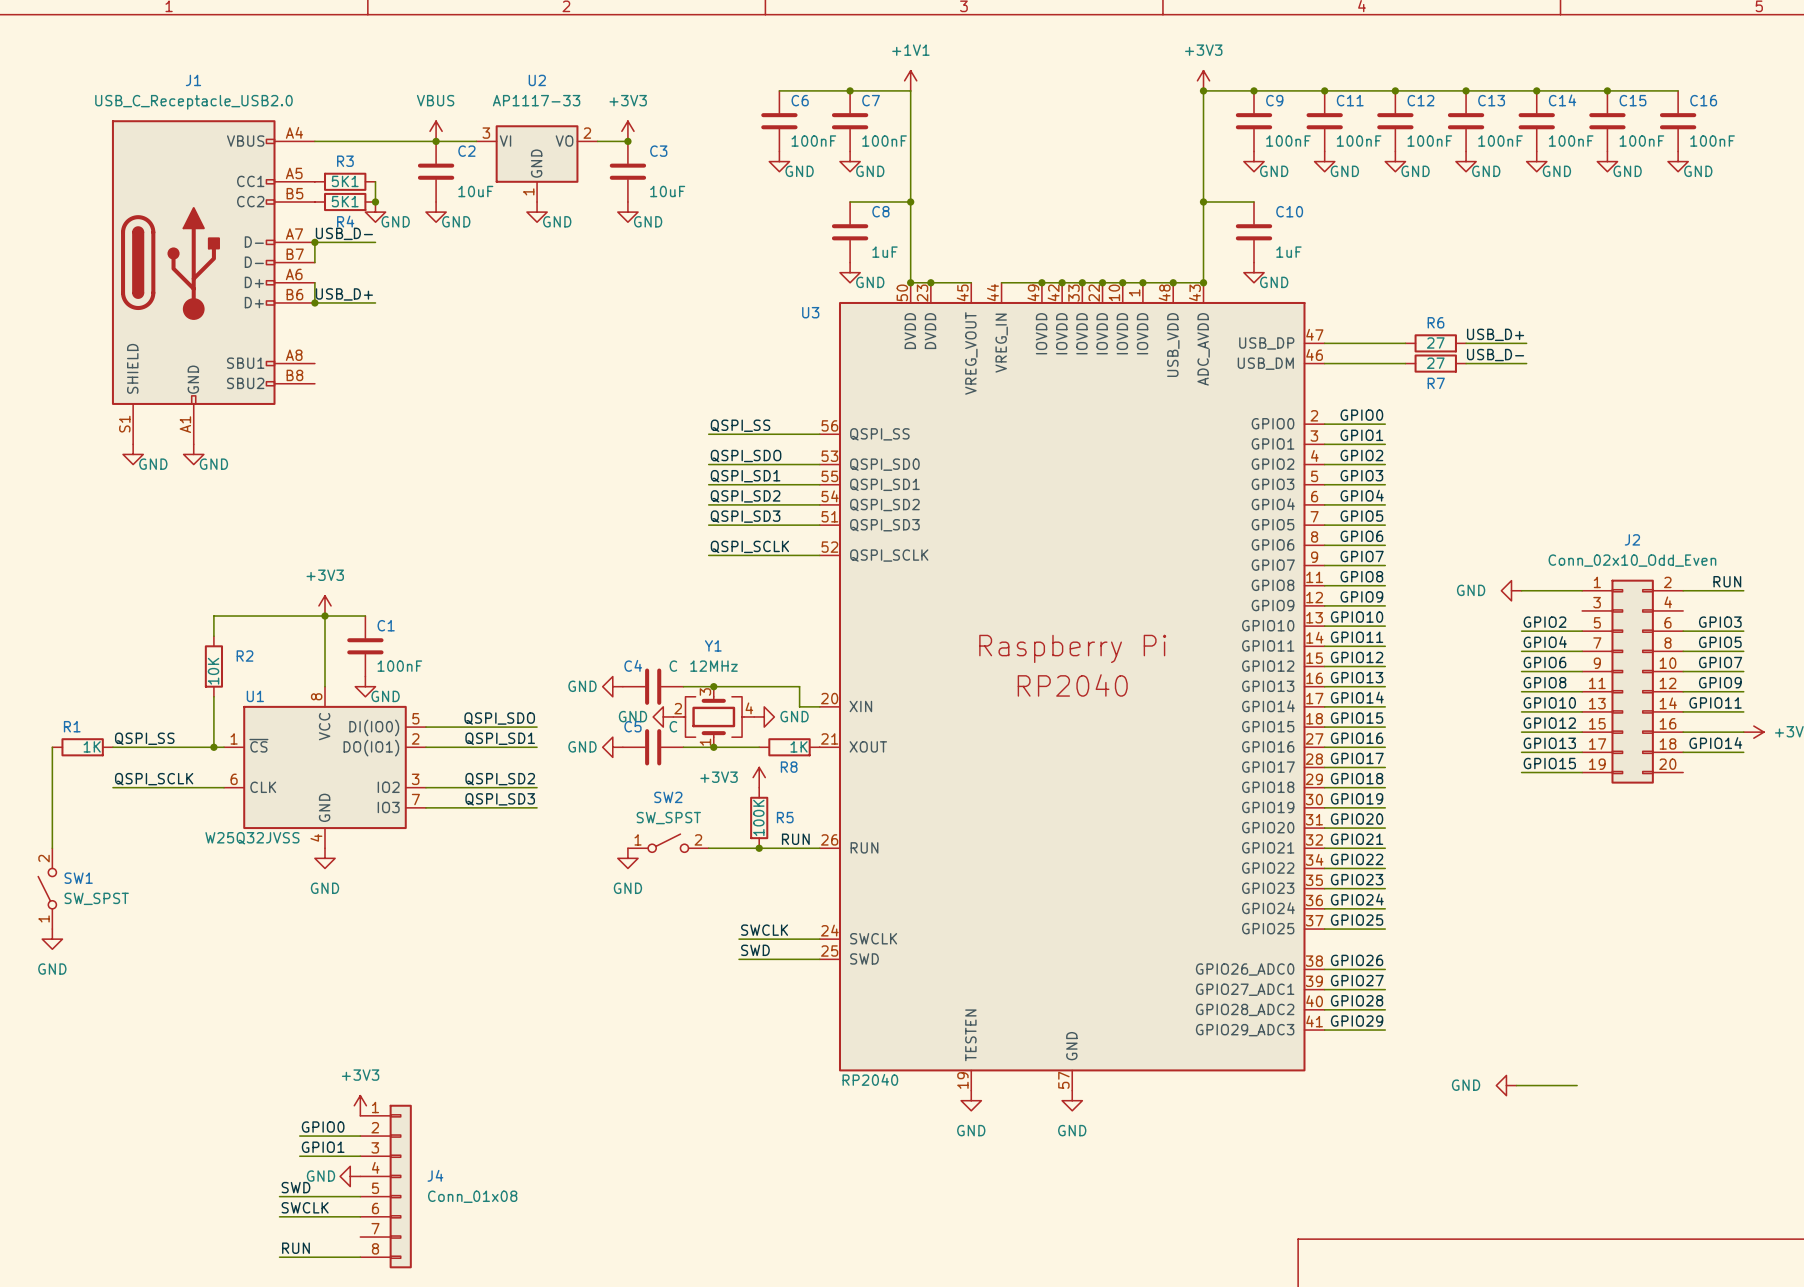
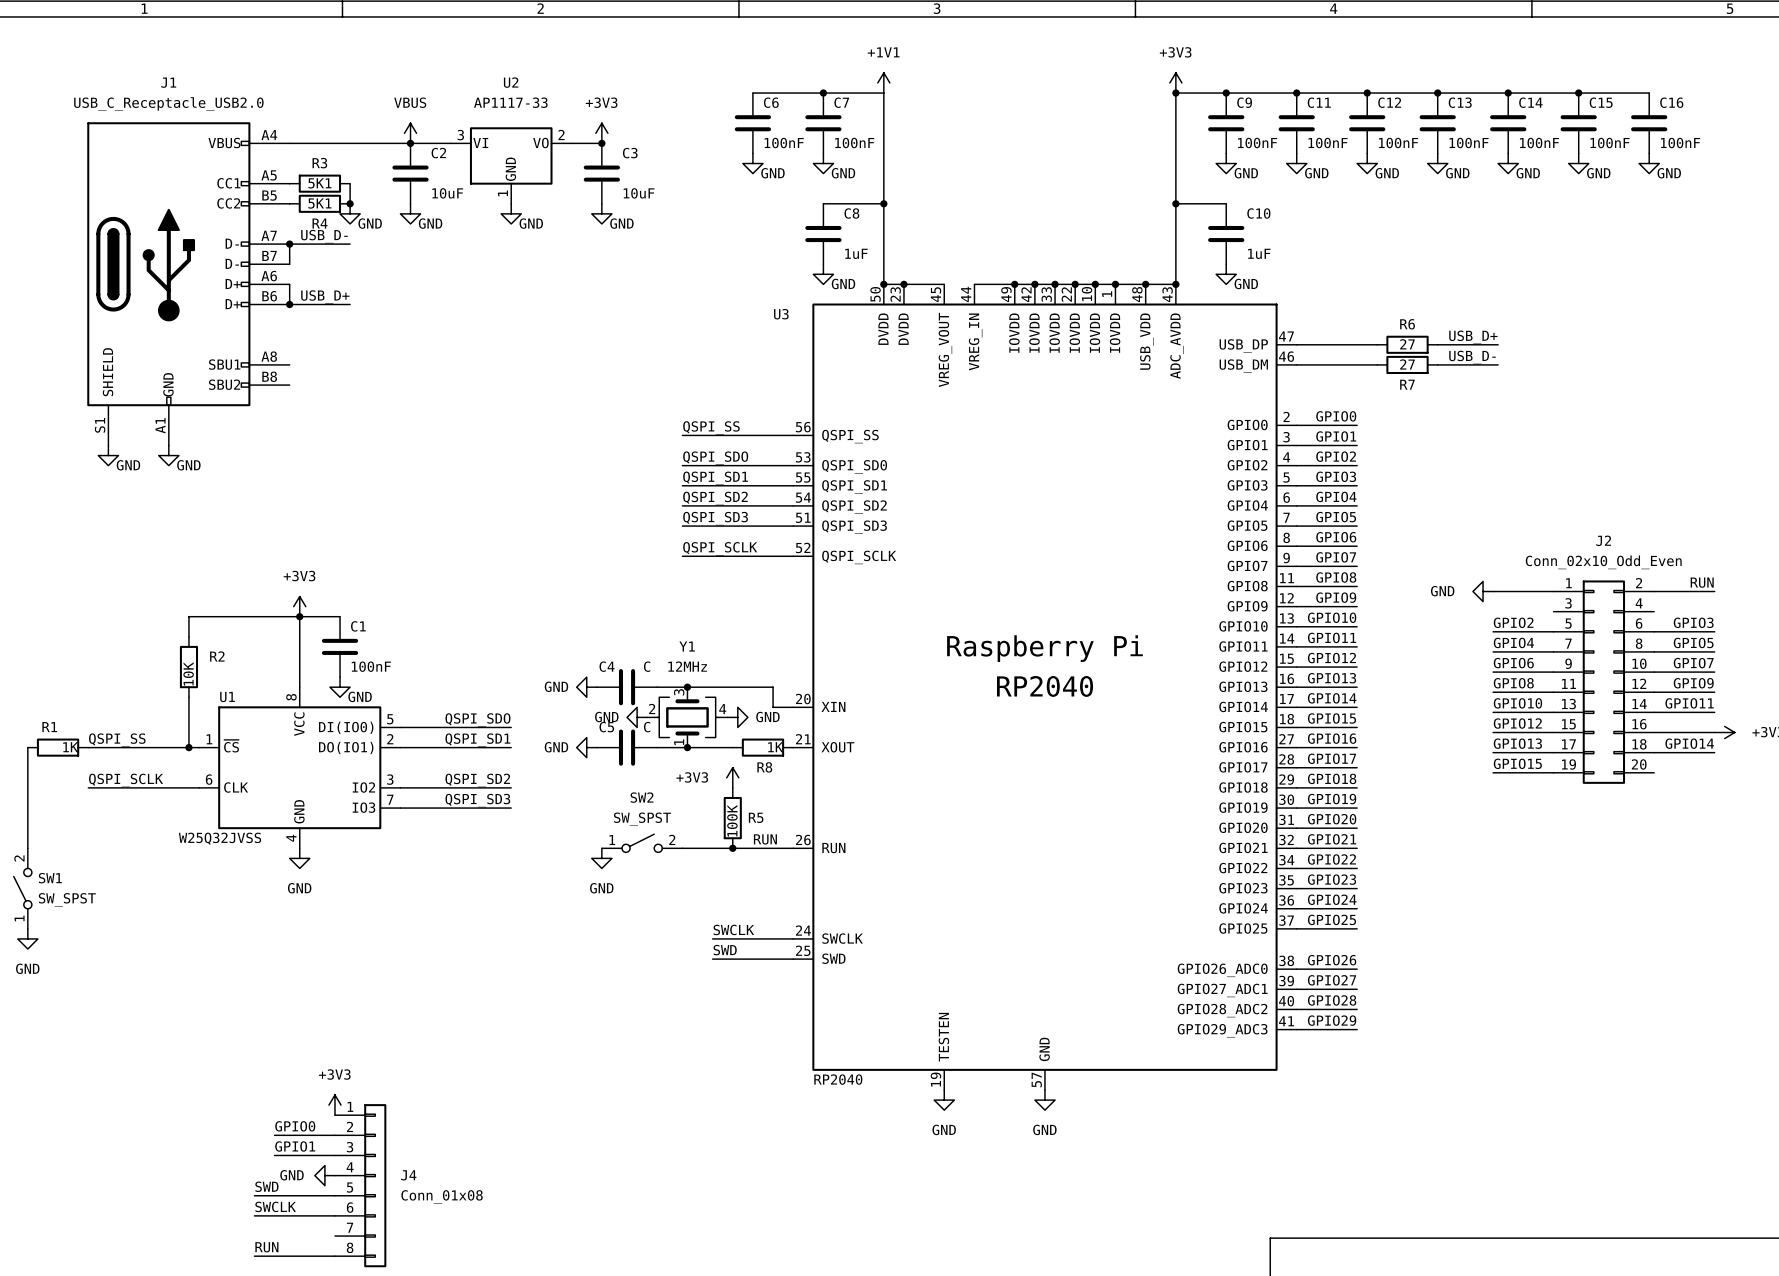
power symbol: GND (1506, 1085) -> none
wire: (1516, 1085) (1577, 1085) -> none

